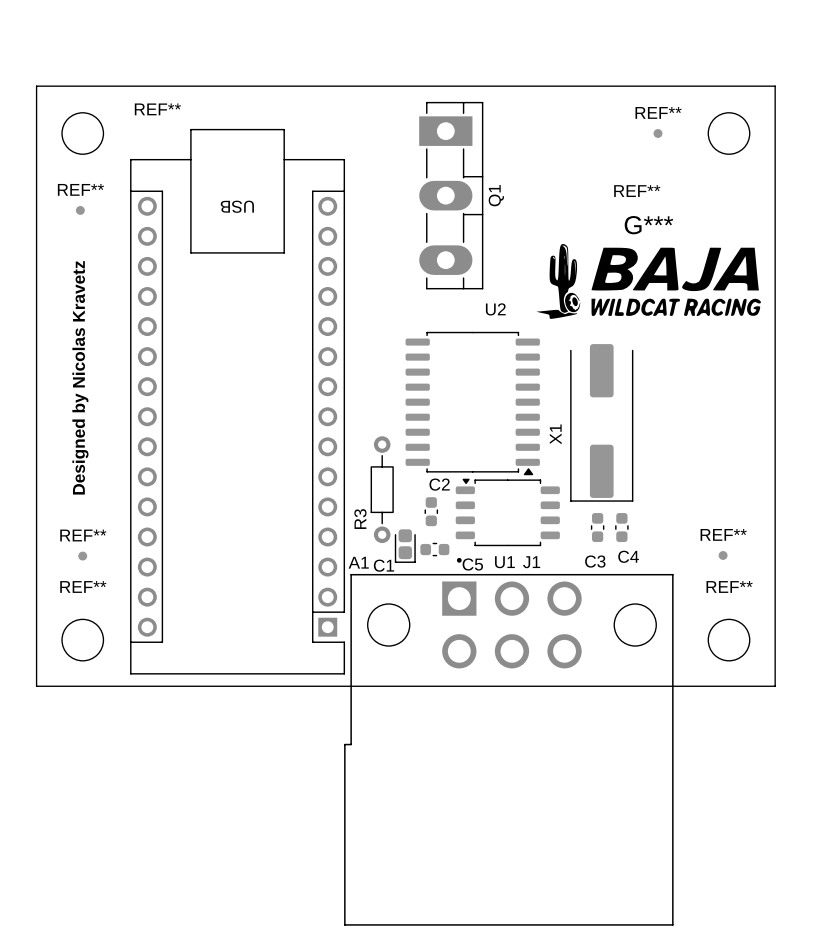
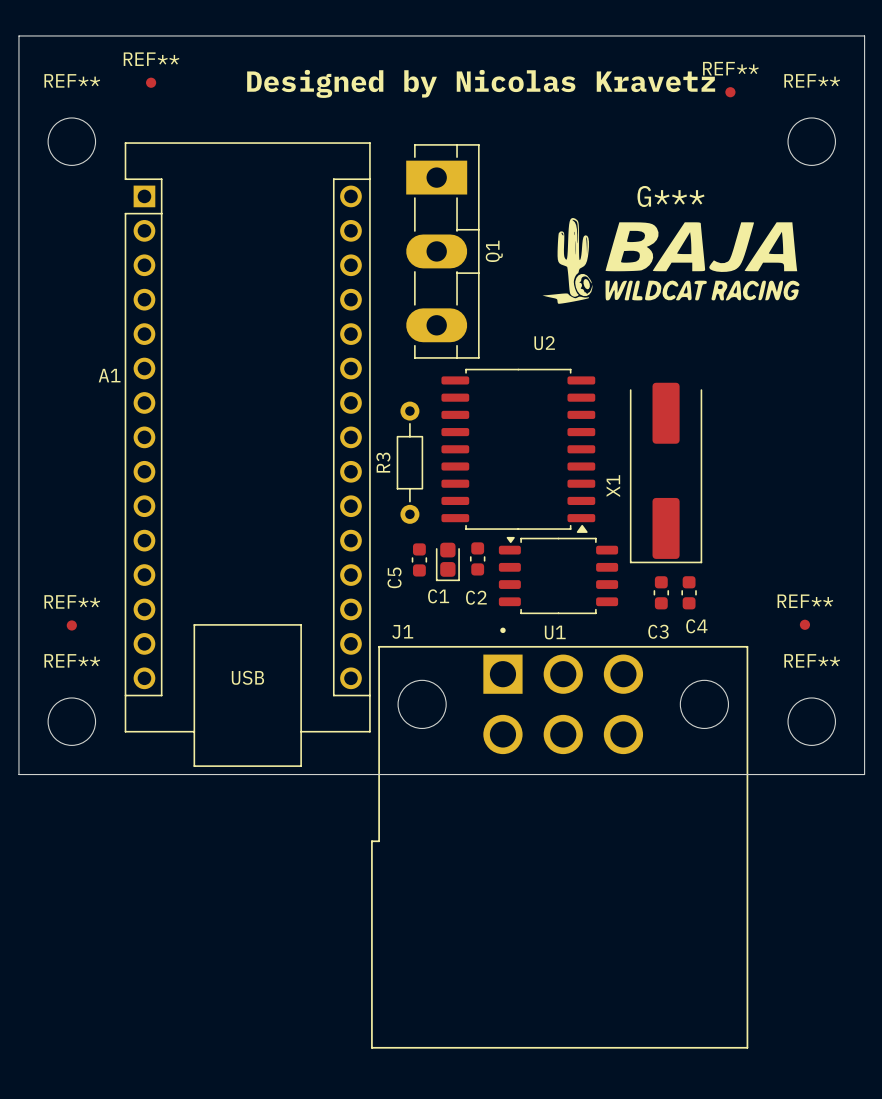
text: none -> Designed by Nicolas Kravetz (481, 83)
board edge: (36, 86) (775, 86) -> (18, 87) (18, 35) (864, 35) (864, 87)
REF** name position: REF** (157, 109) -> REF** (72, 80)
REF** position: (657, 133) -> (730, 92)
REF** name position: REF** (637, 191) -> REF** (812, 80)
Q1 position: (451, 195) -> (442, 251)
REF** position: (80, 210) -> (151, 82)
G*** position: (648, 281) -> (671, 260)
text: Designed by Nicolas Kravetz (80, 377) -> none
A1 rotation: 0° (237, 401) -> 180° (247, 454)
C2 name position: C2 (439, 484) -> C2 (476, 597)
R3 position: (382, 489) -> (409, 462)
C2 position: (431, 511) -> (477, 558)
R3 name position: R3 (360, 519) -> R3 (383, 462)
C1 position: (405, 546) -> (447, 561)
C5 rotation: 0° (434, 549) -> 90° clockwise (419, 559)
C5 position: (434, 549) -> (419, 559)
A1 name position: A1 (358, 562) -> A1 (109, 375)
J1 name position: J1 (531, 562) -> J1 (402, 631)
C1 name position: C1 (383, 565) -> C1 (438, 596)

